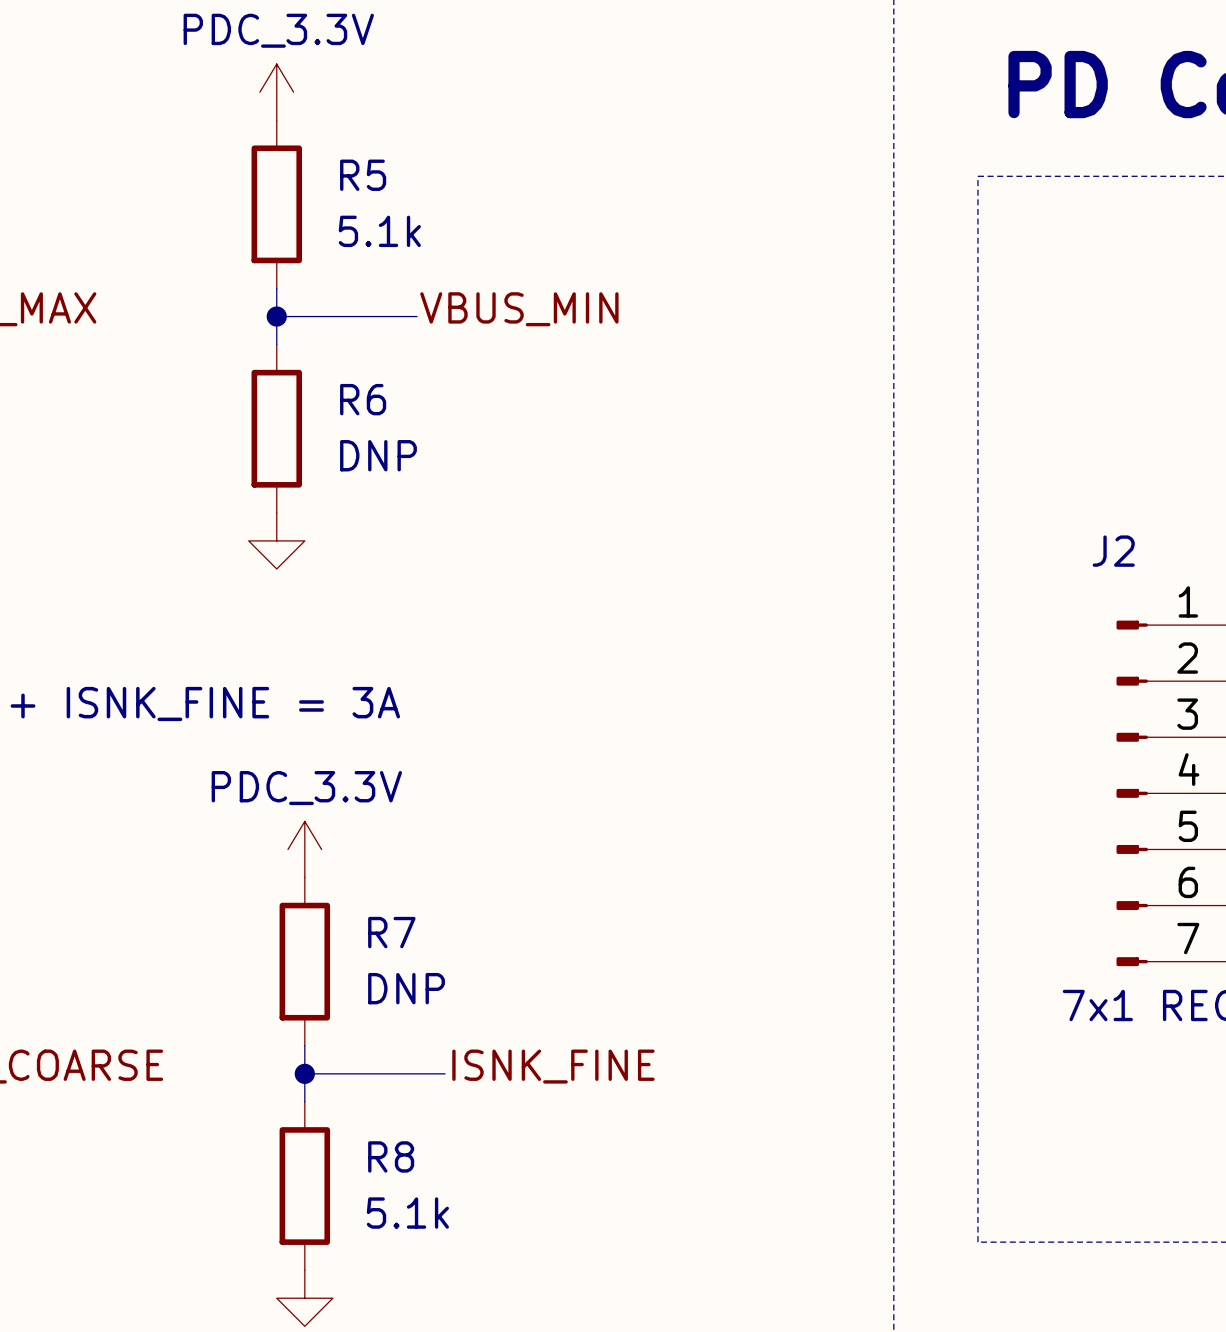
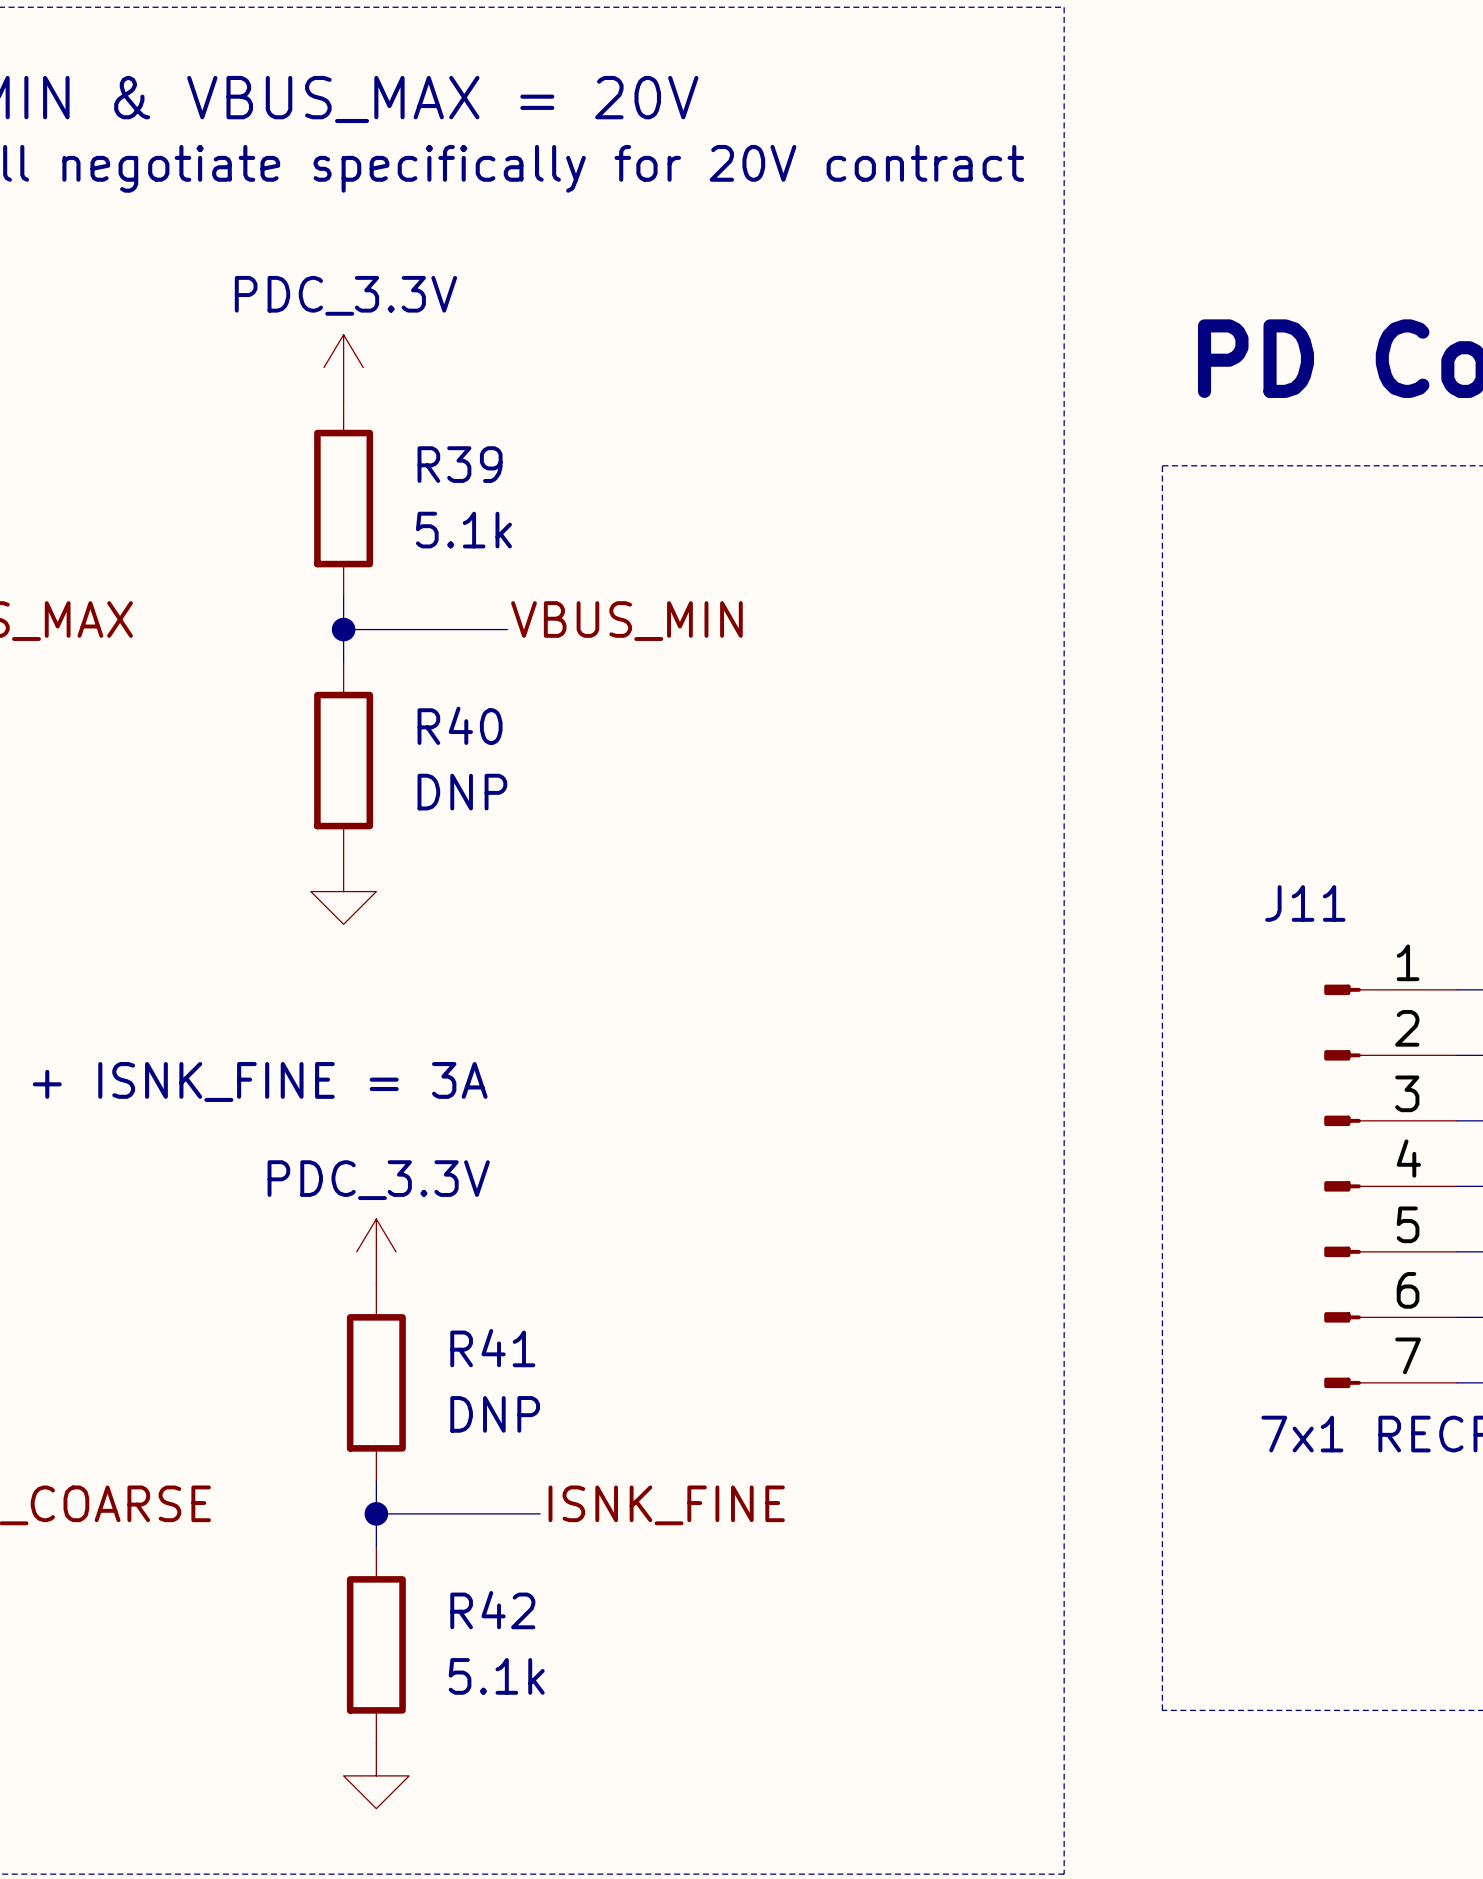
R5 name: R5 (363, 175) -> R39 (460, 464)
R6 name: R6 (363, 399) -> R40 (460, 725)
J2 name: J2 (1113, 551) -> J11 (1305, 903)
R7 name: R7 (391, 932) -> R41 (492, 1348)
R8 name: R8 (391, 1156) -> R42 (492, 1610)

